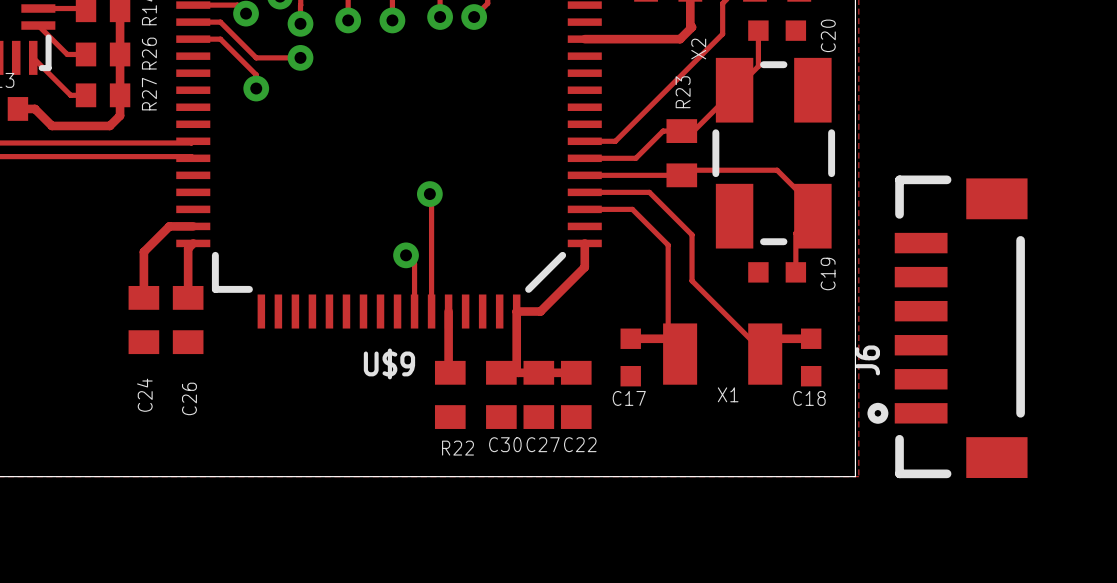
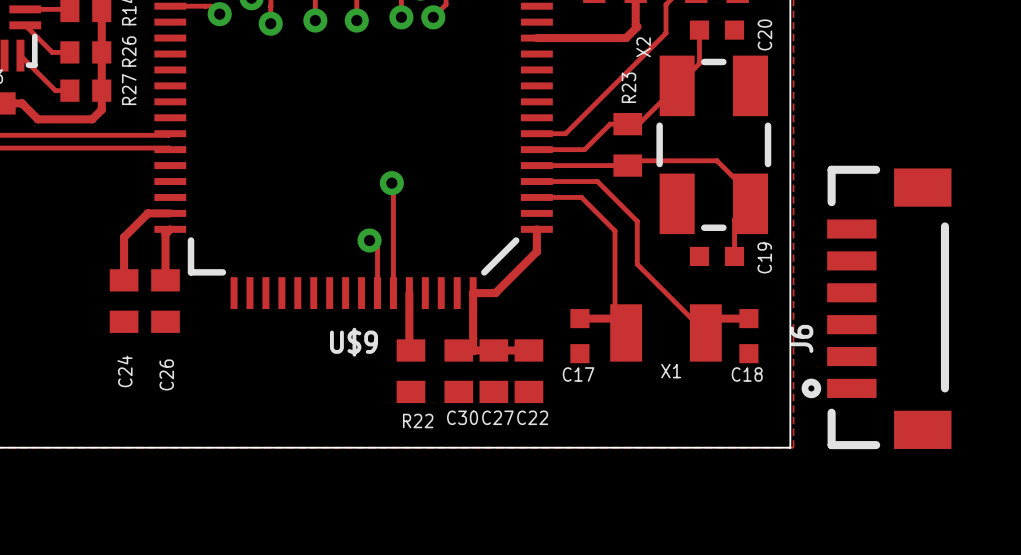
track: (193, 22) (220, 22) (256, 57) (300, 57) -> none
track: (193, 39) (220, 39) (256, 74) (256, 88) -> none
via: (300, 57) -> none
via: (256, 88) -> none

